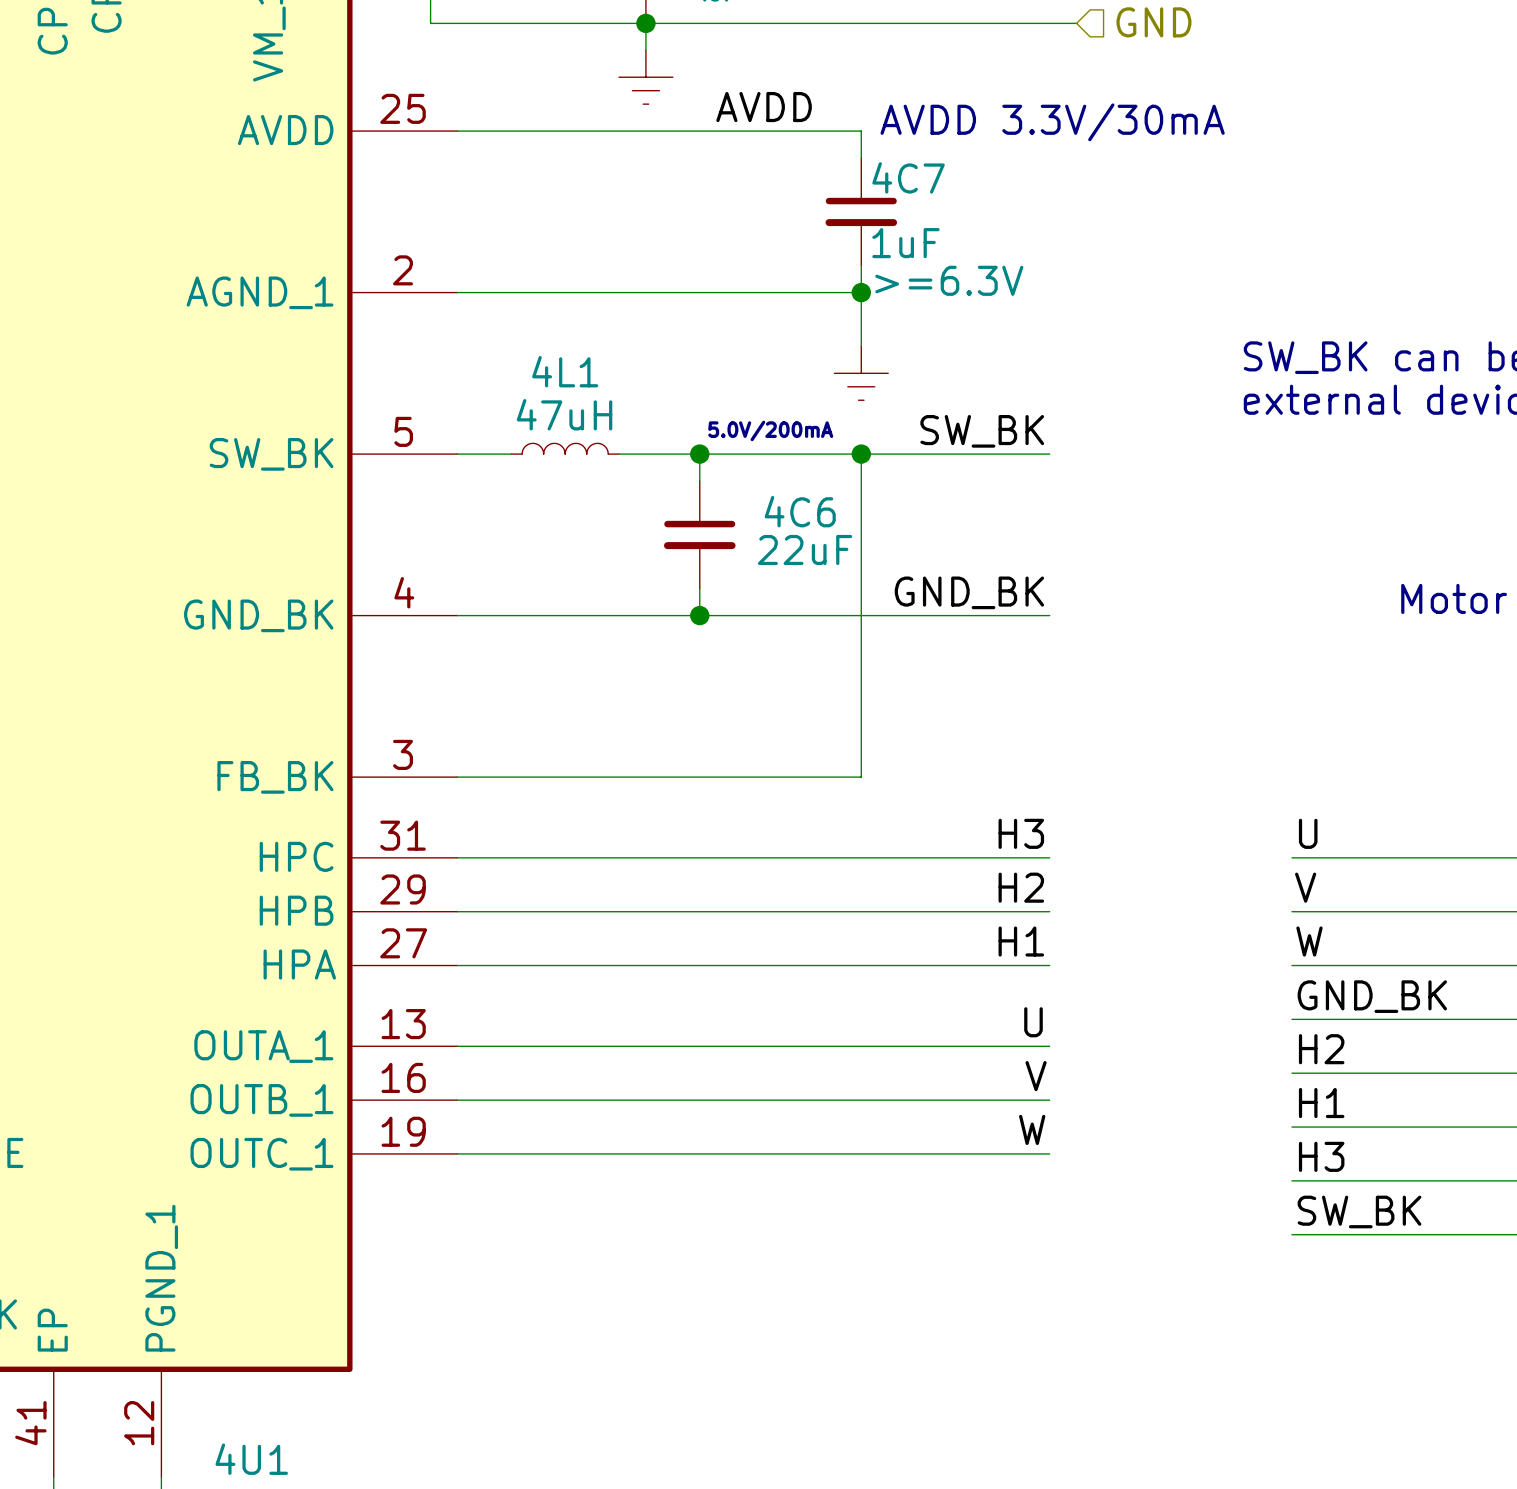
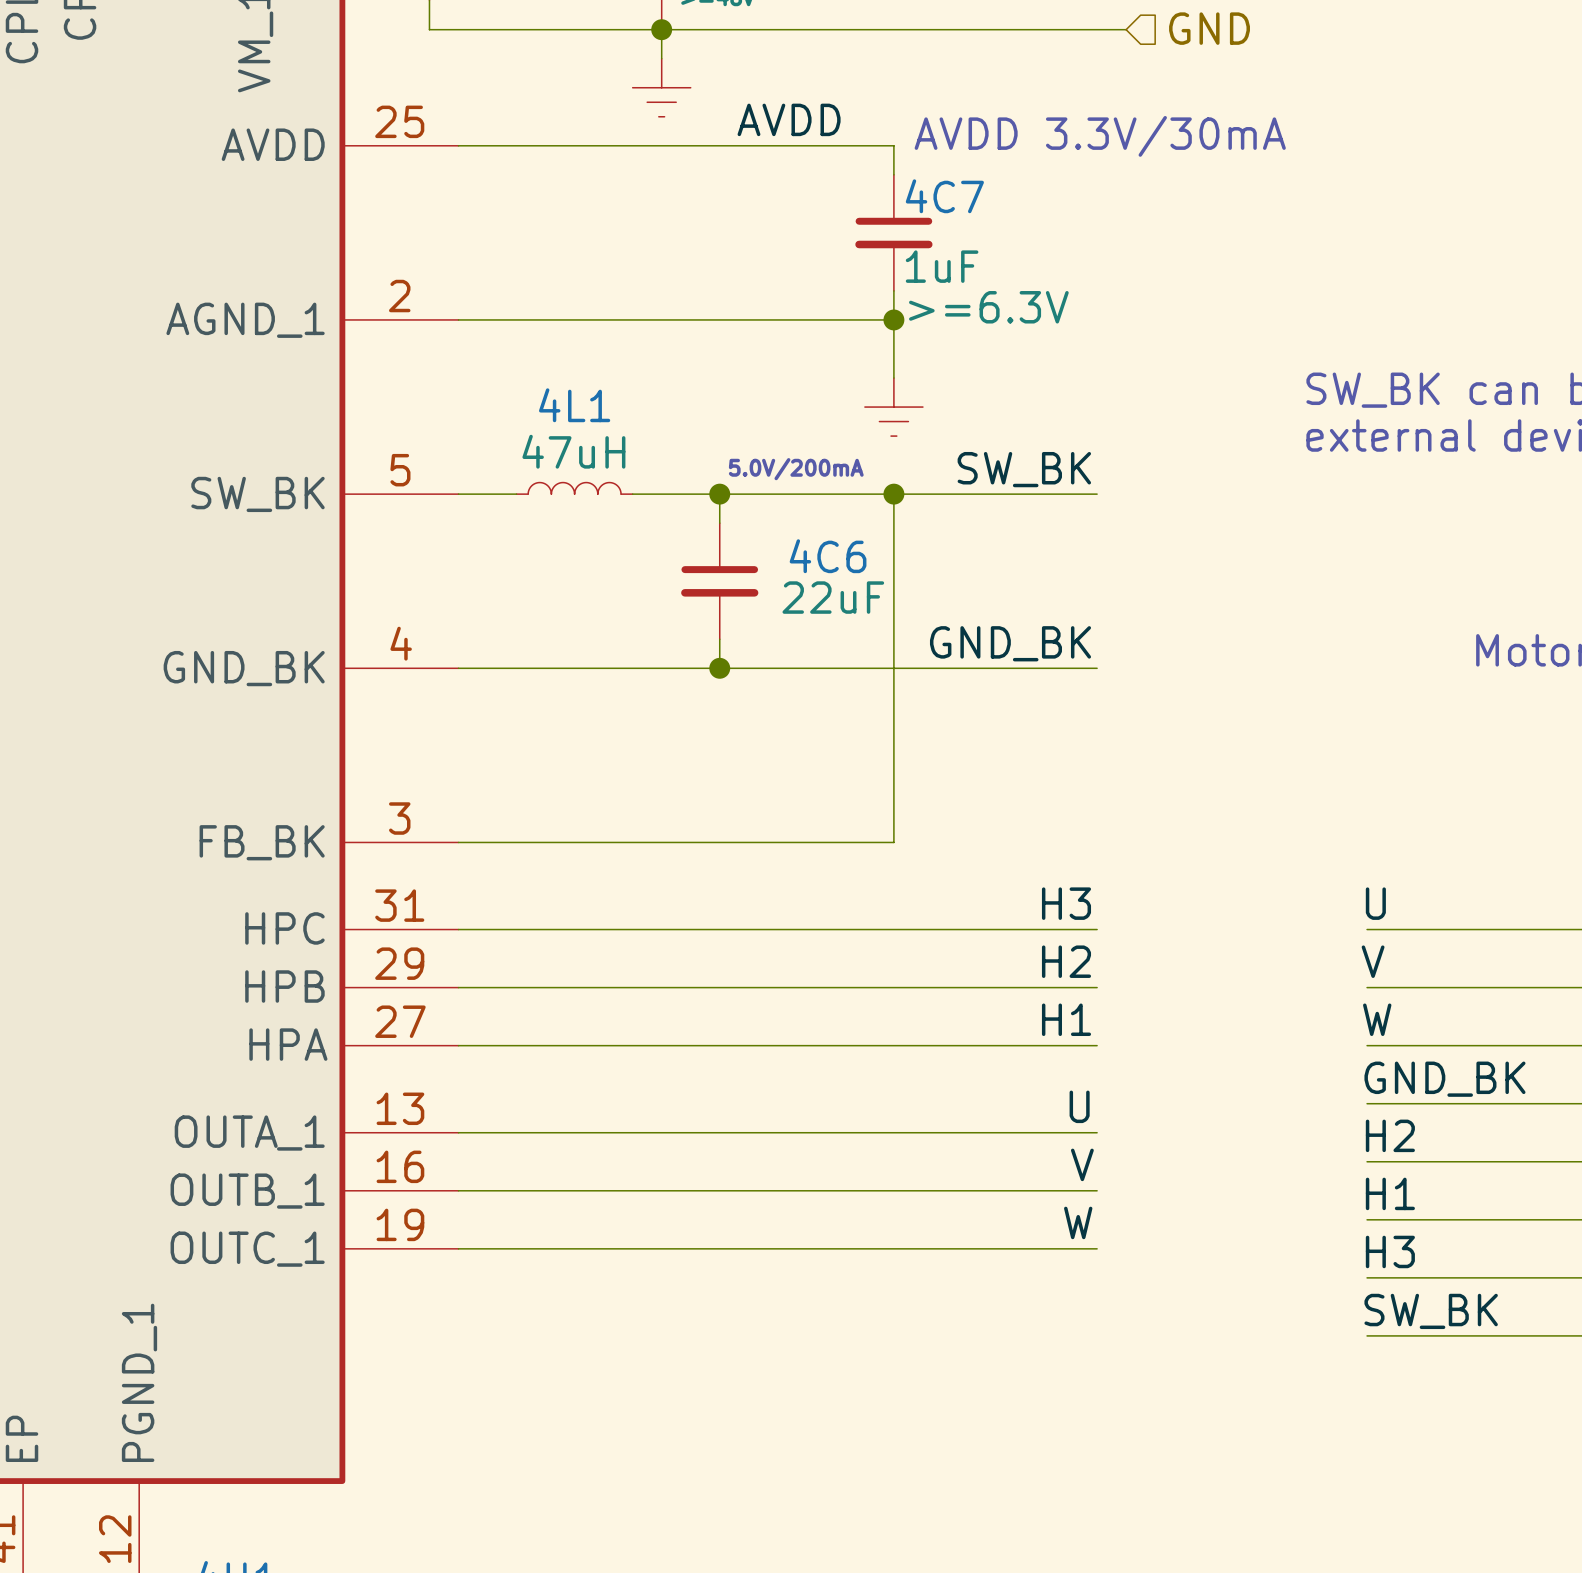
wire: (1291, 857) (1300, 857) -> none
wire: (1291, 911) (1300, 911) -> none
wire: (1291, 965) (1300, 965) -> none
wire: (1291, 1019) (1300, 1019) -> none
wire: (1291, 1073) (1300, 1073) -> none
wire: (1291, 1127) (1300, 1127) -> none
wire: (1291, 1180) (1300, 1180) -> none
wire: (1291, 1234) (1300, 1234) -> none

